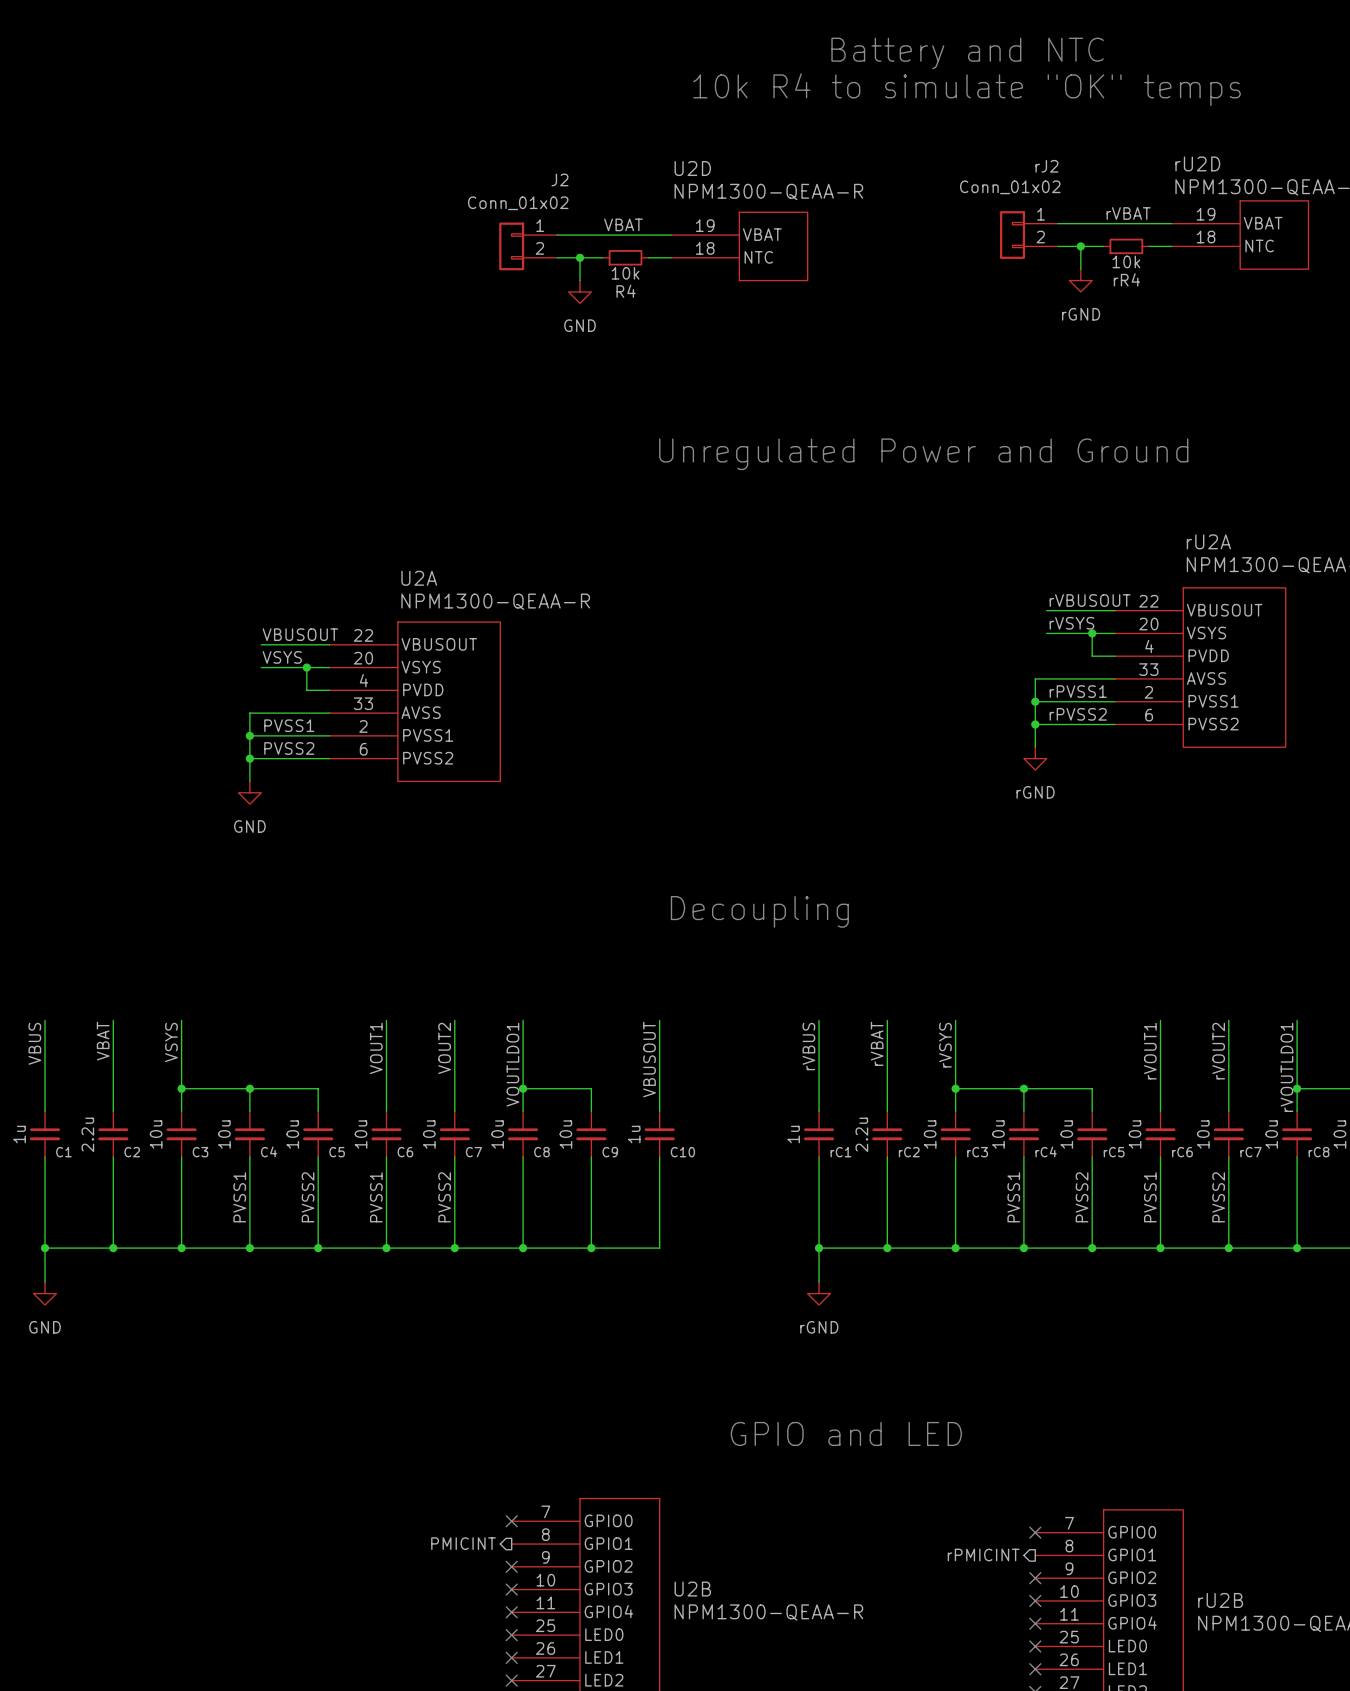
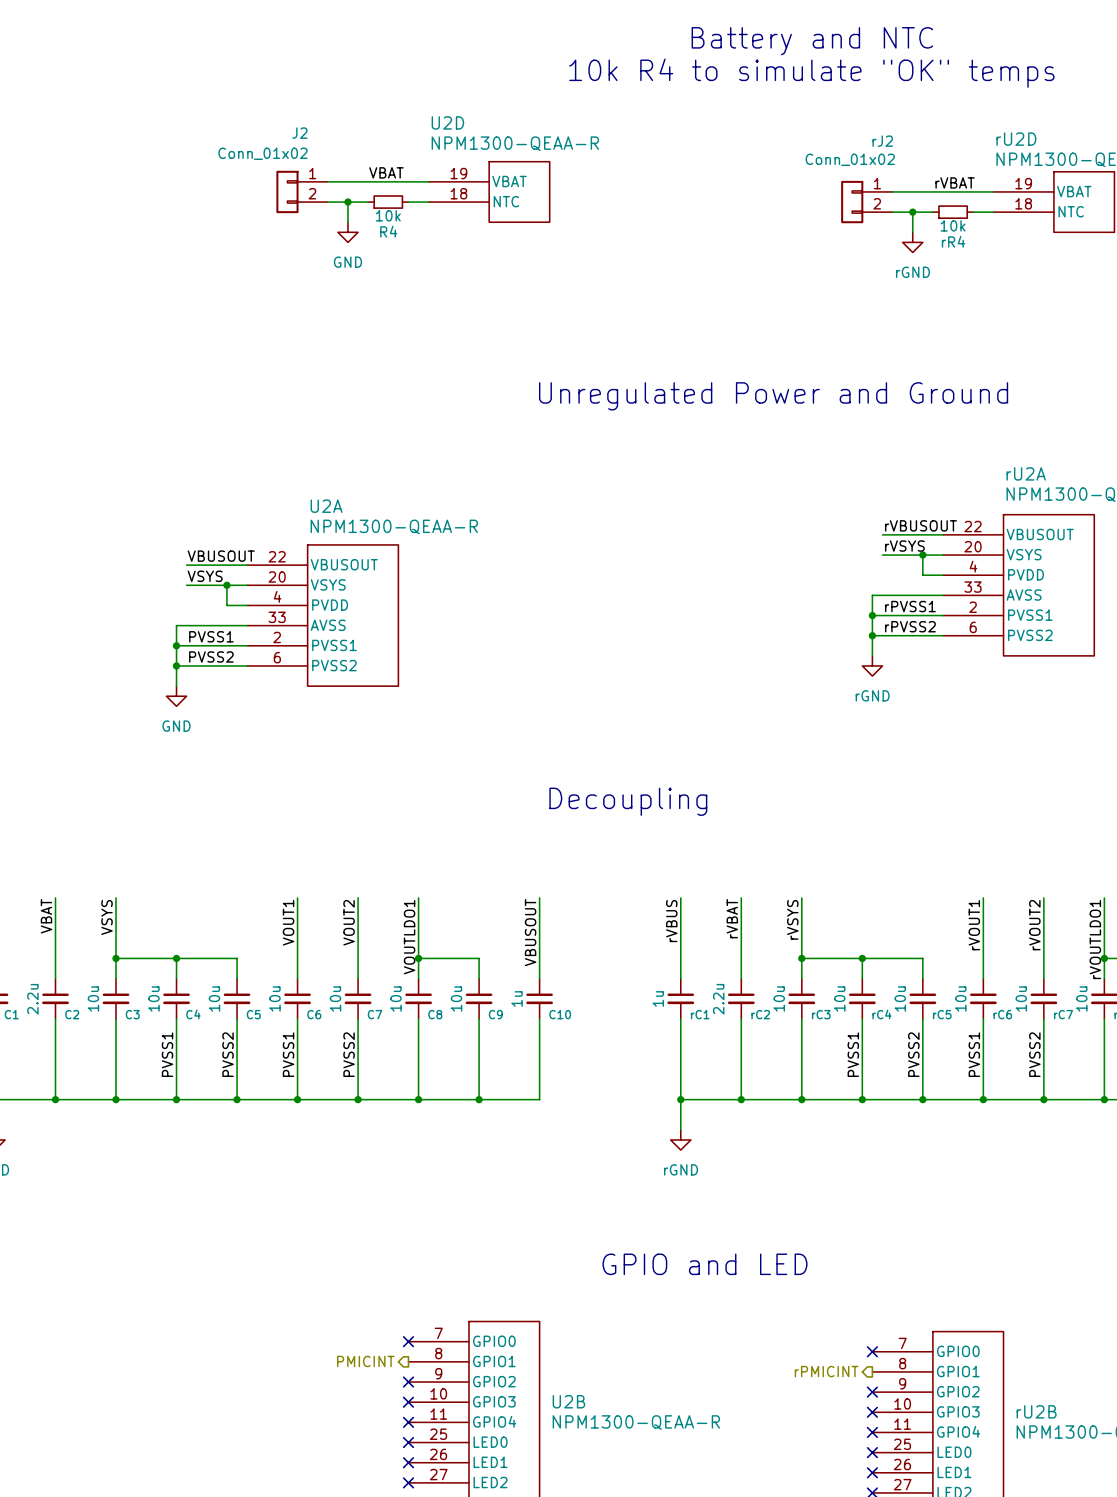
J2 name position: J2 (559, 179) -> J2 (299, 133)
J2 value position: Conn_01x02 (518, 203) -> Conn_01x02 (262, 153)
label position: VBAT (623, 224) -> VBAT (386, 172)
junction: none -> (347, 202)
wire: (557, 235) (671, 235) -> (327, 181) (428, 181)
J2 position: (528, 246) -> (302, 191)
U2D position: (739, 246) -> (489, 191)
wire: (557, 257) (602, 257) -> (327, 202) (368, 202)
wire: (579, 257) (579, 280) -> (347, 202) (347, 222)
junction: (579, 257) -> none
R4 position: (625, 257) -> (388, 202)
power symbol position: GND (579, 291) -> GND (347, 232)

